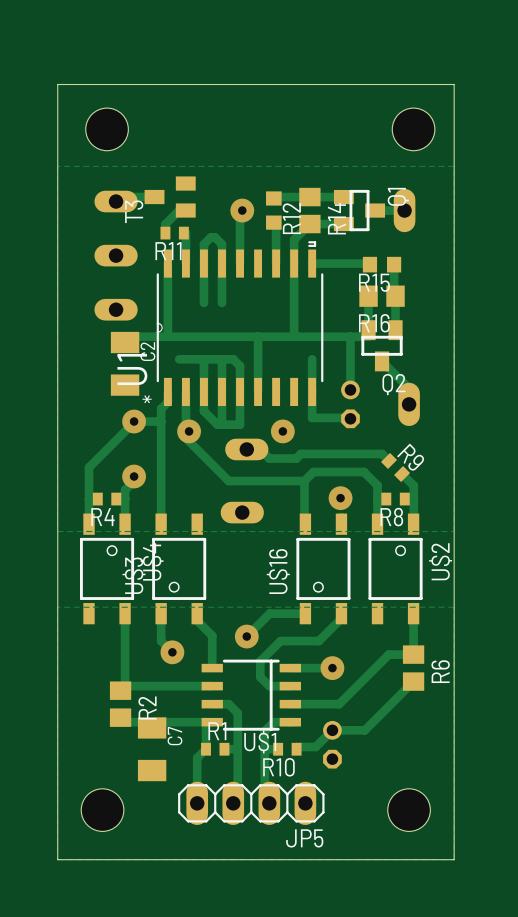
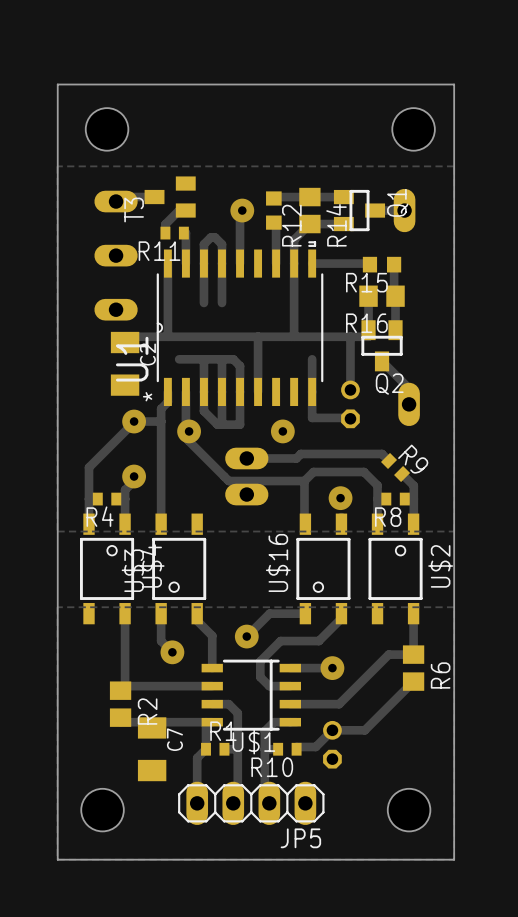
part: (246, 449) -> none
part: none -> (246, 476)
part: (242, 512) -> none

